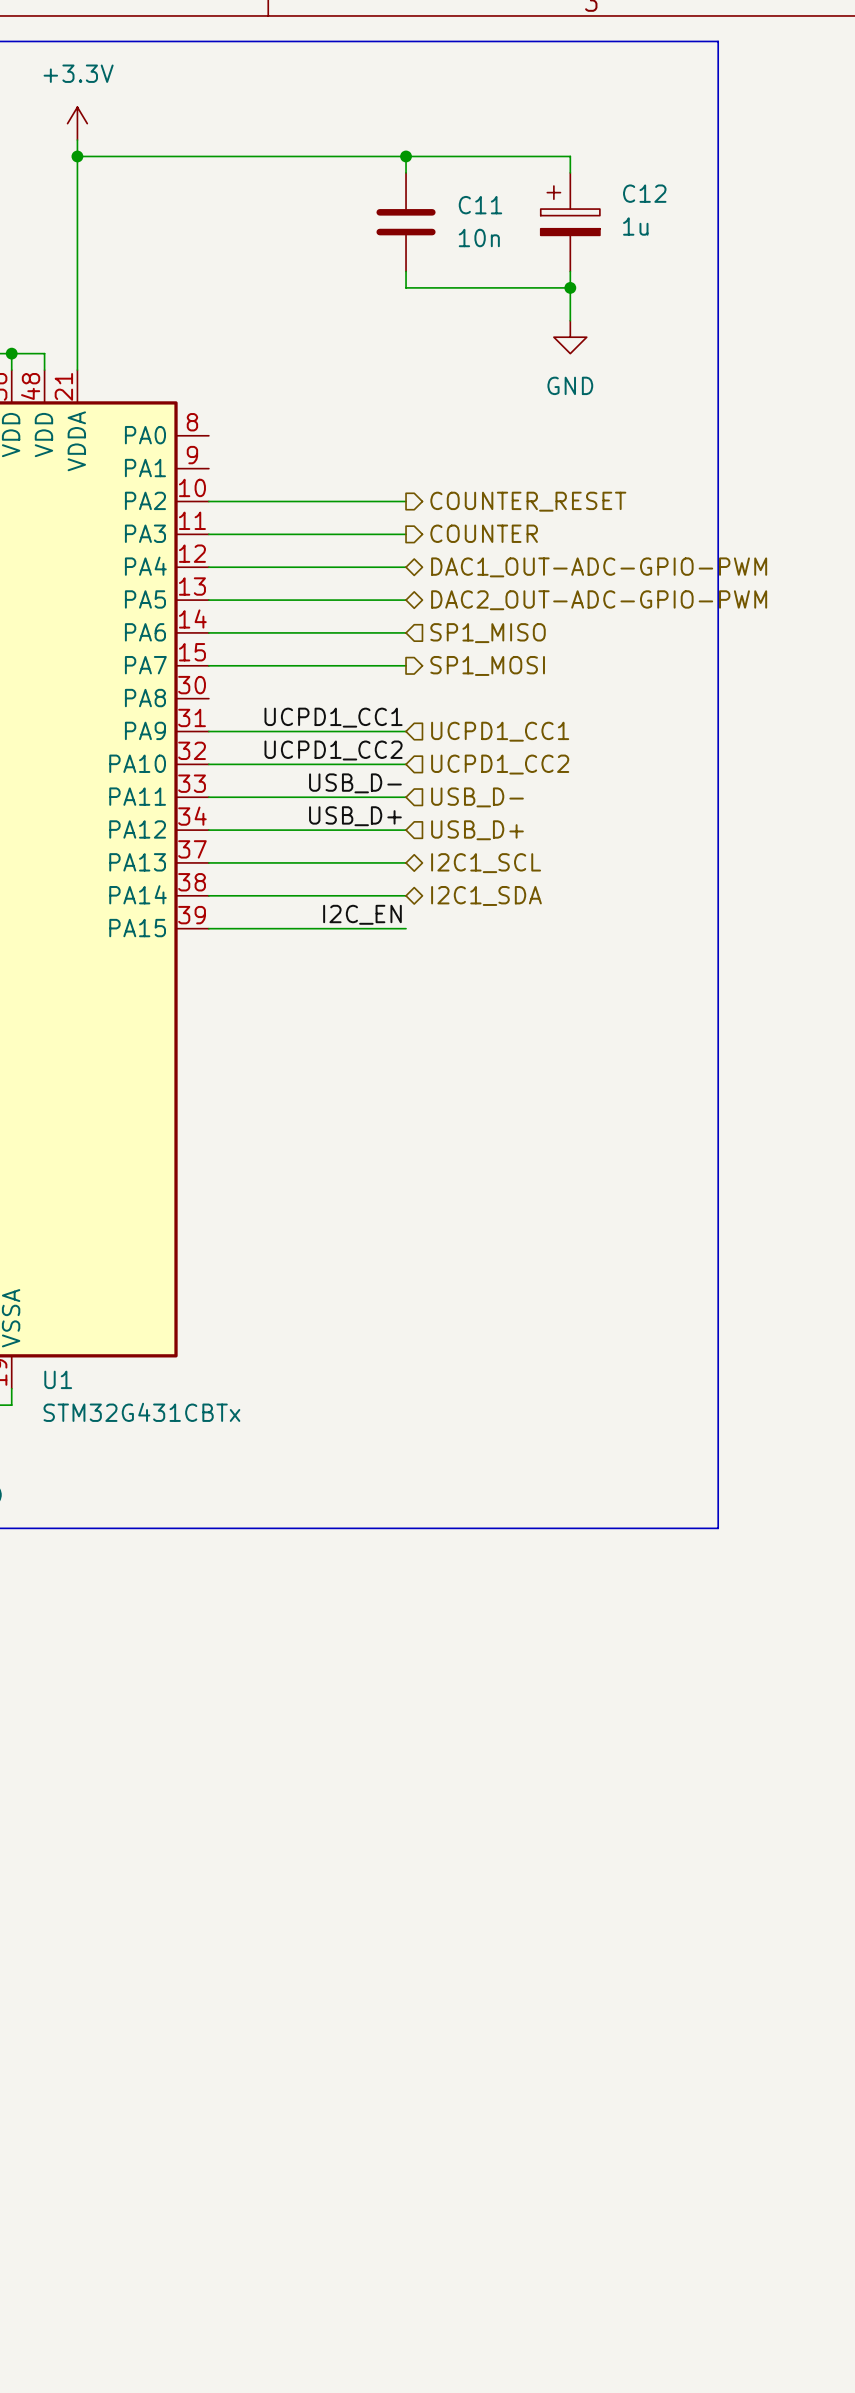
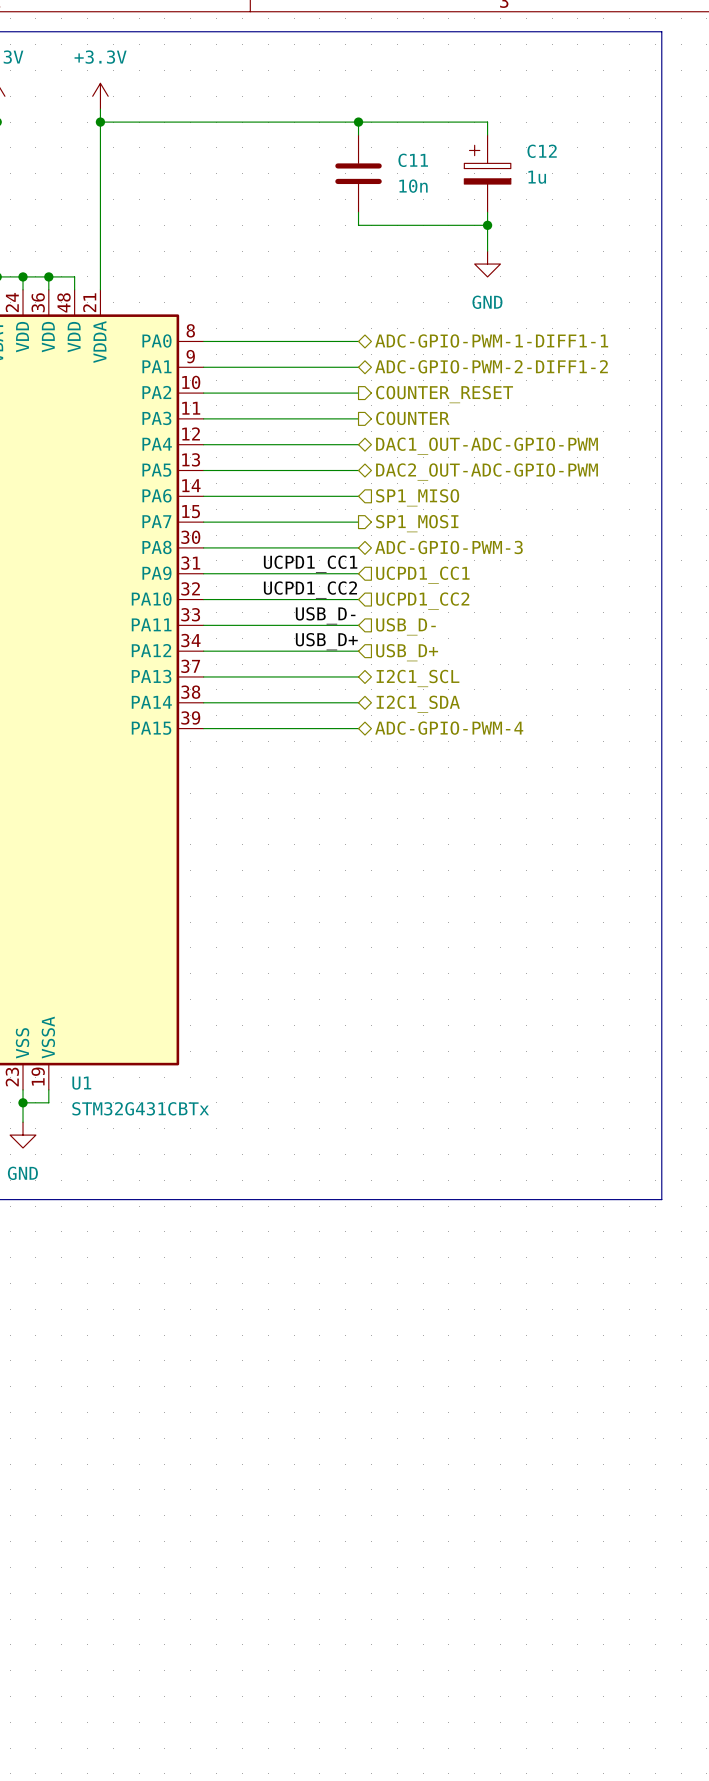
line: (718, 41) (718, 1528) -> (603, 31) (661, 31) (661, 1199) (603, 1199)
wire: none -> (203, 341) (358, 341)
hierarchical label: none -> ADC-GPIO-PWM-1-DIFF1-1 (491, 340)
wire: none -> (203, 367) (358, 367)
hierarchical label: none -> ADC-GPIO-PWM-2-DIFF1-2 (491, 366)
wire: none -> (203, 547) (358, 547)
hierarchical label: none -> ADC-GPIO-PWM-3 (449, 547)
label: I2C_EN (362, 914) -> none
hierarchical label: none -> ADC-GPIO-PWM-4 (449, 728)

